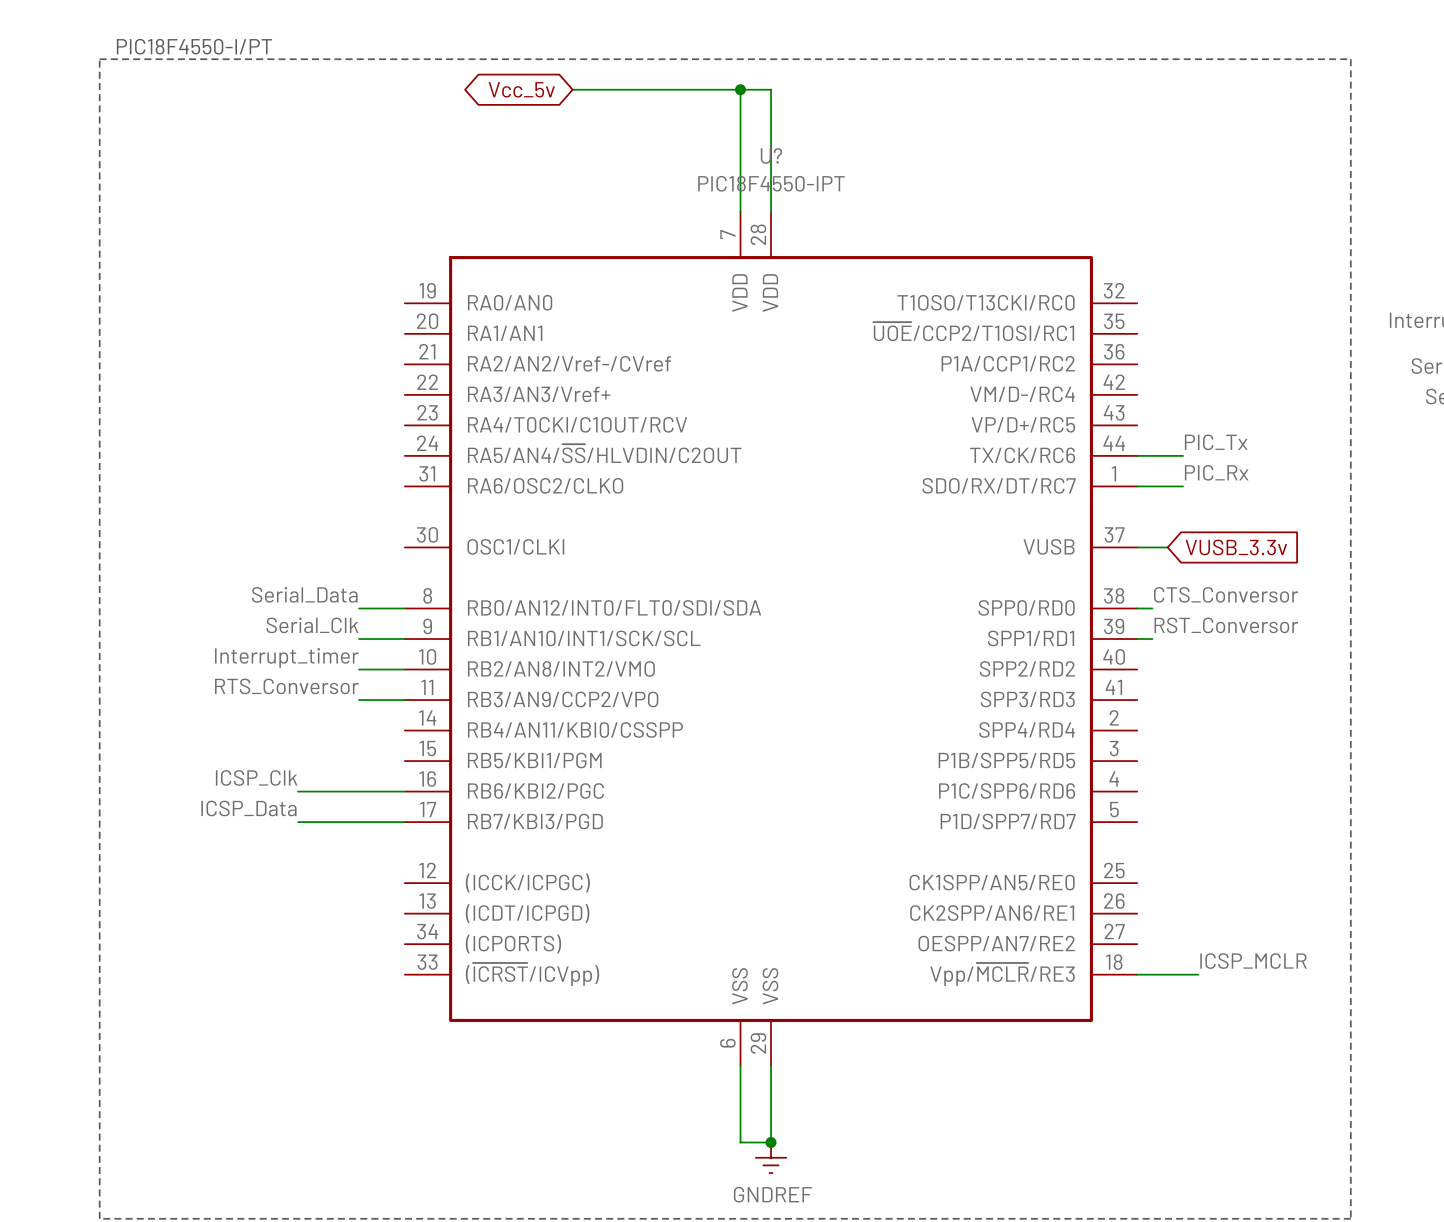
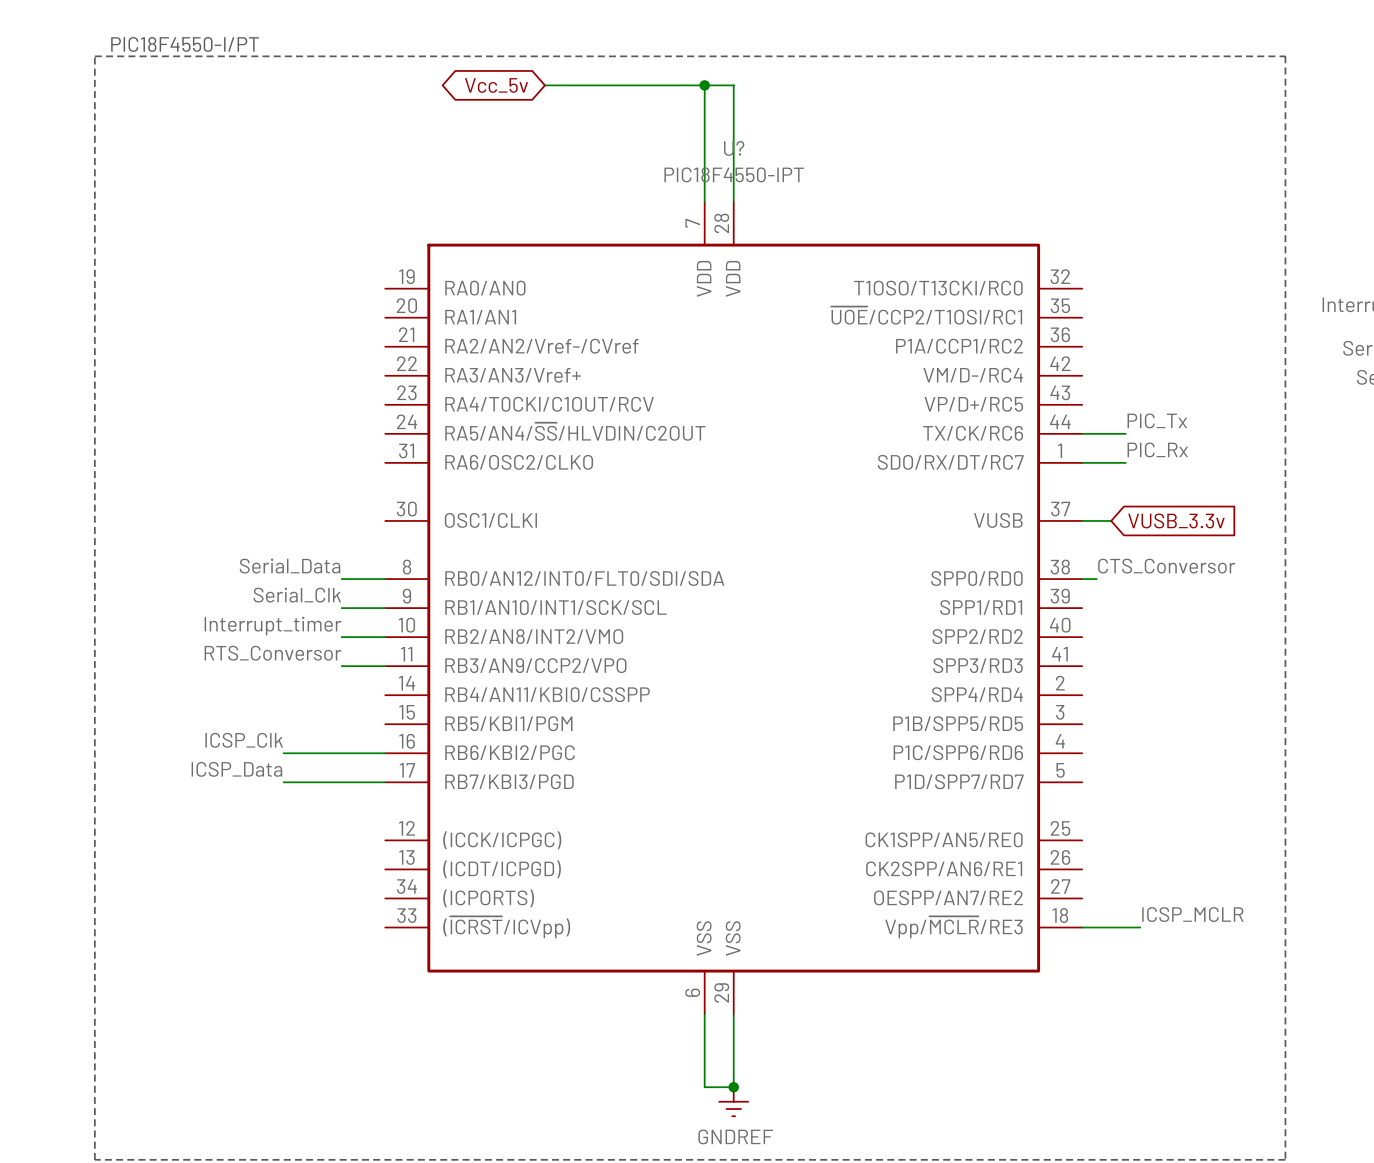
label: RST_Conversor (1226, 625) -> none
wire: (1137, 639) (1152, 639) -> none

